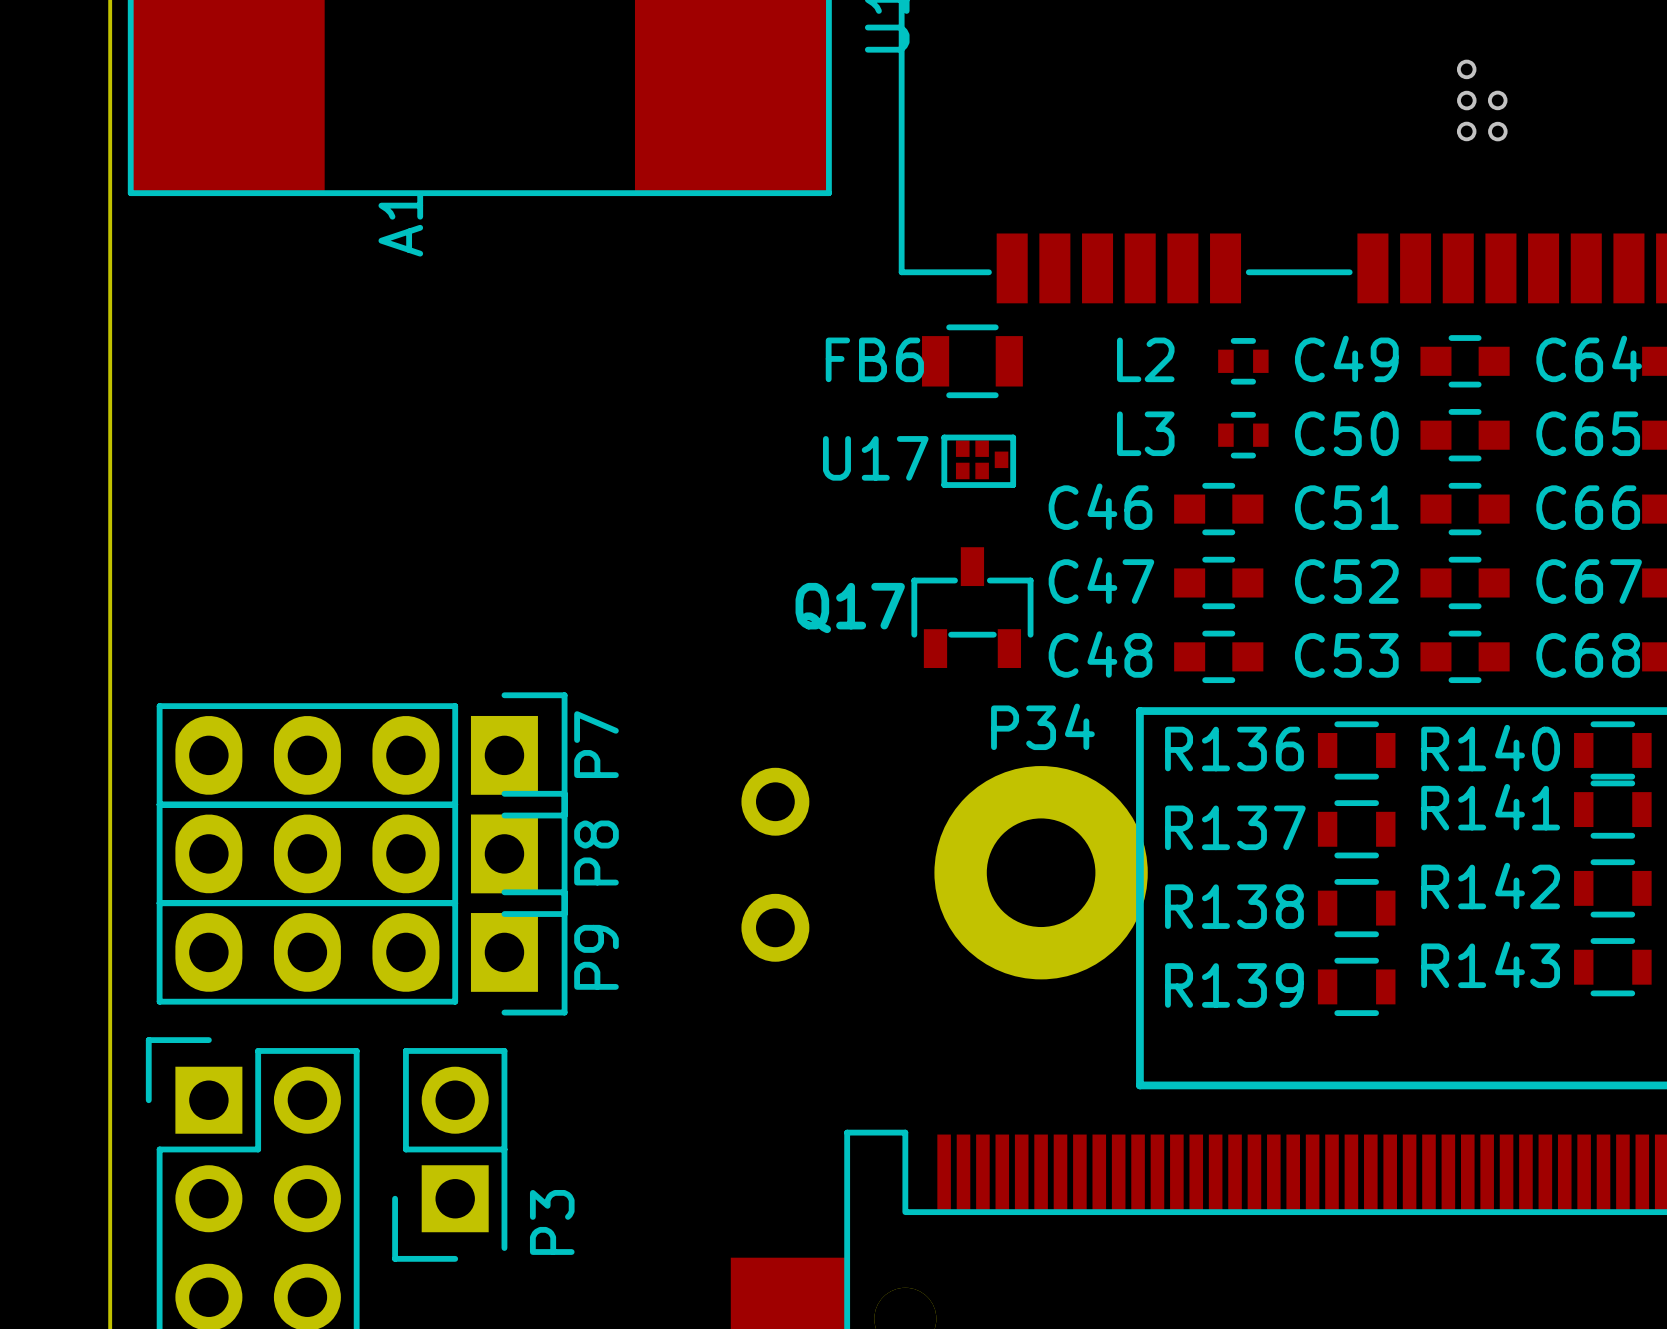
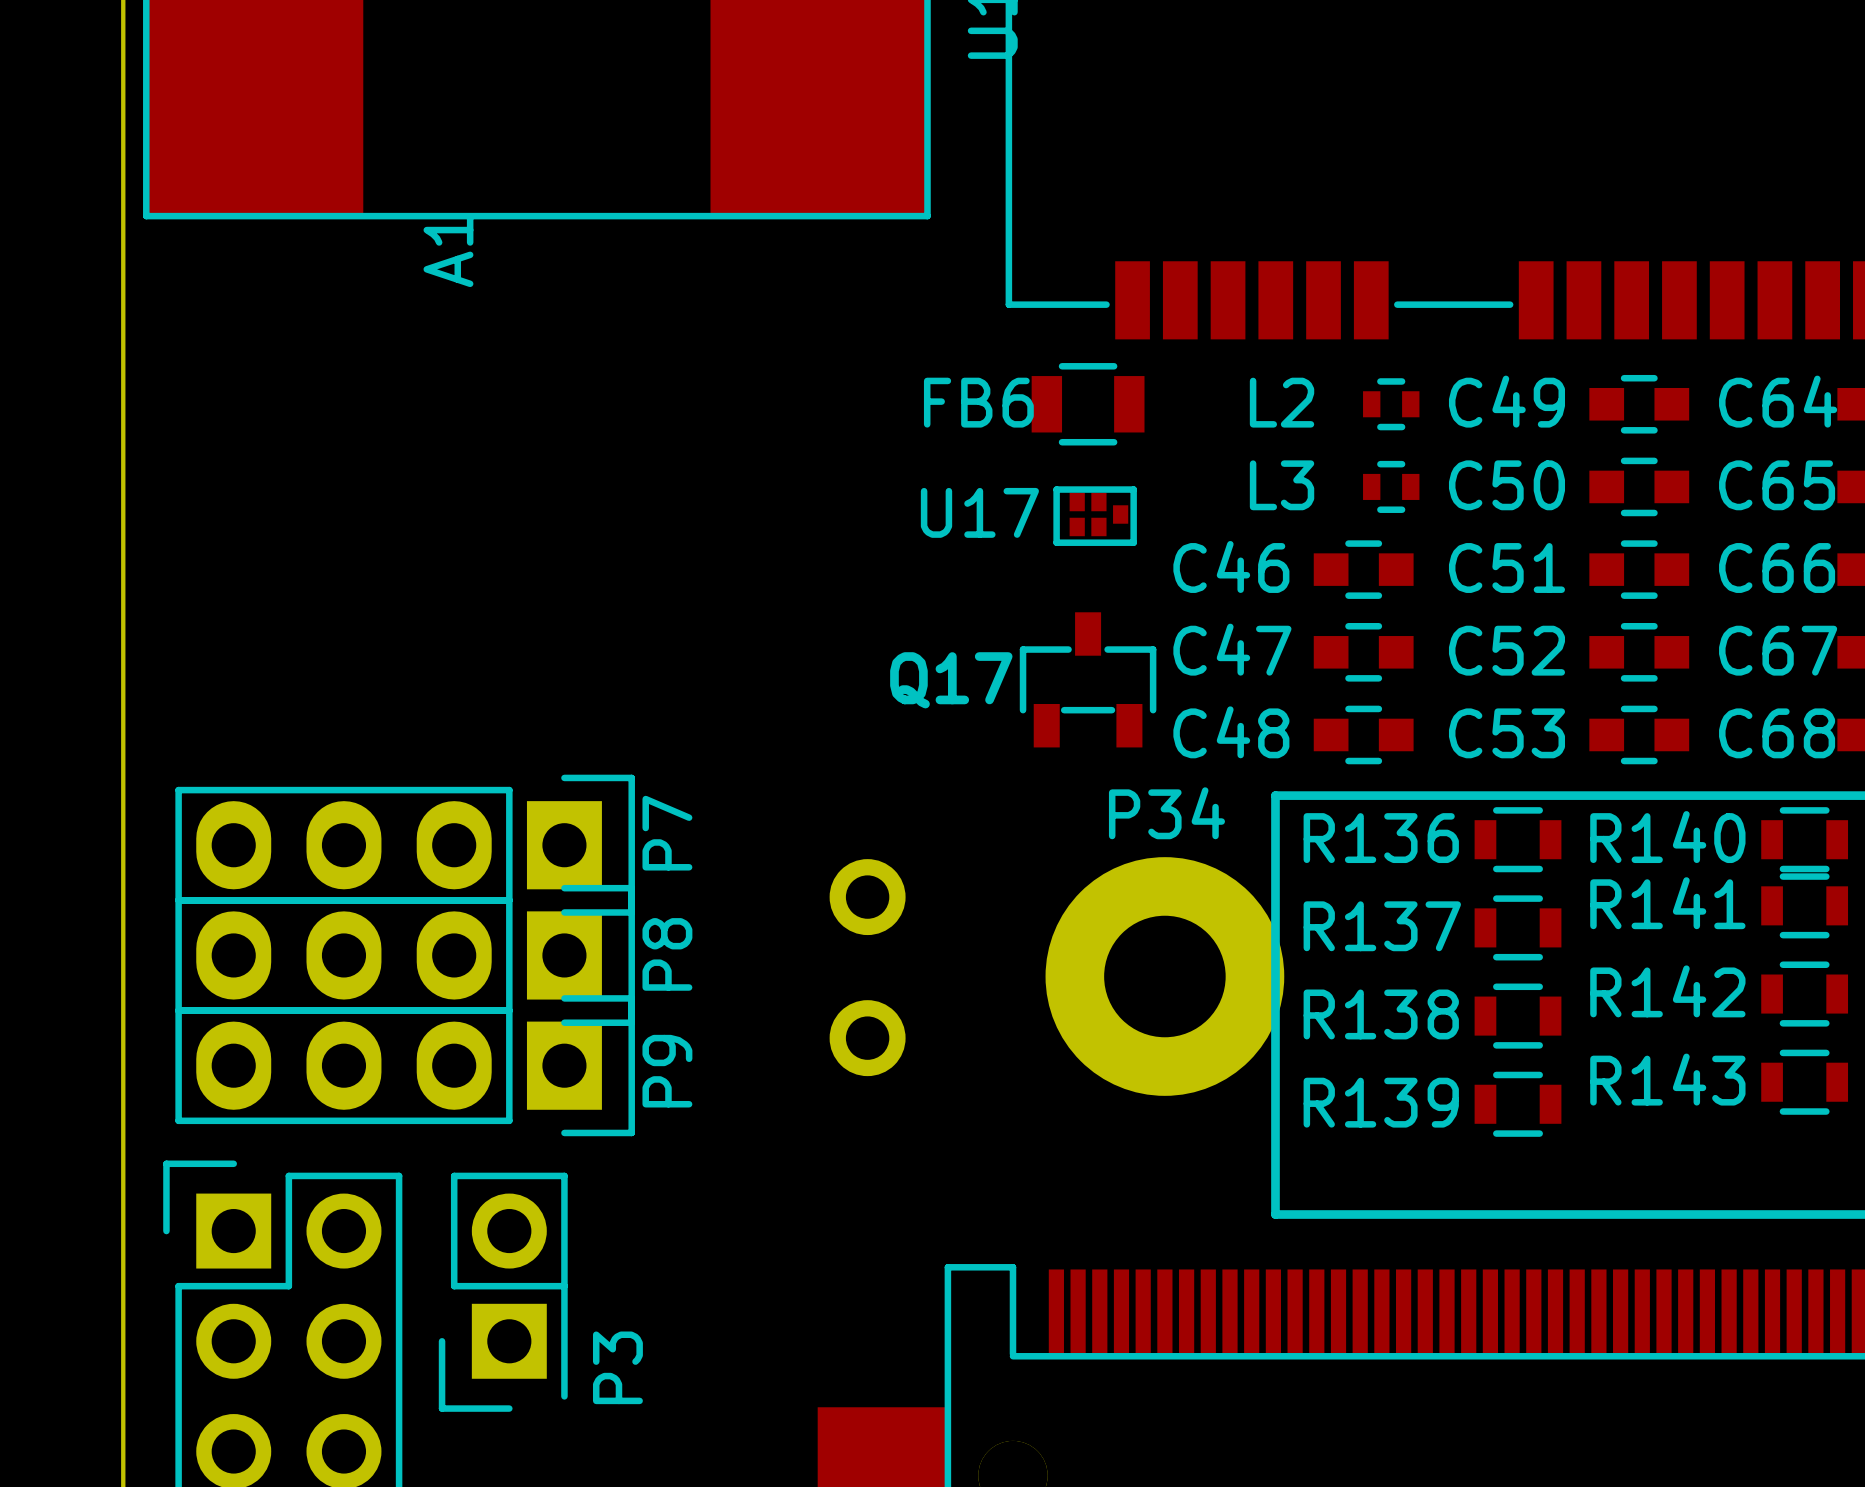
via: (1466, 69) -> none
via: (1466, 100) -> none
via: (1497, 100) -> none
via: (1466, 131) -> none
via: (1497, 131) -> none

